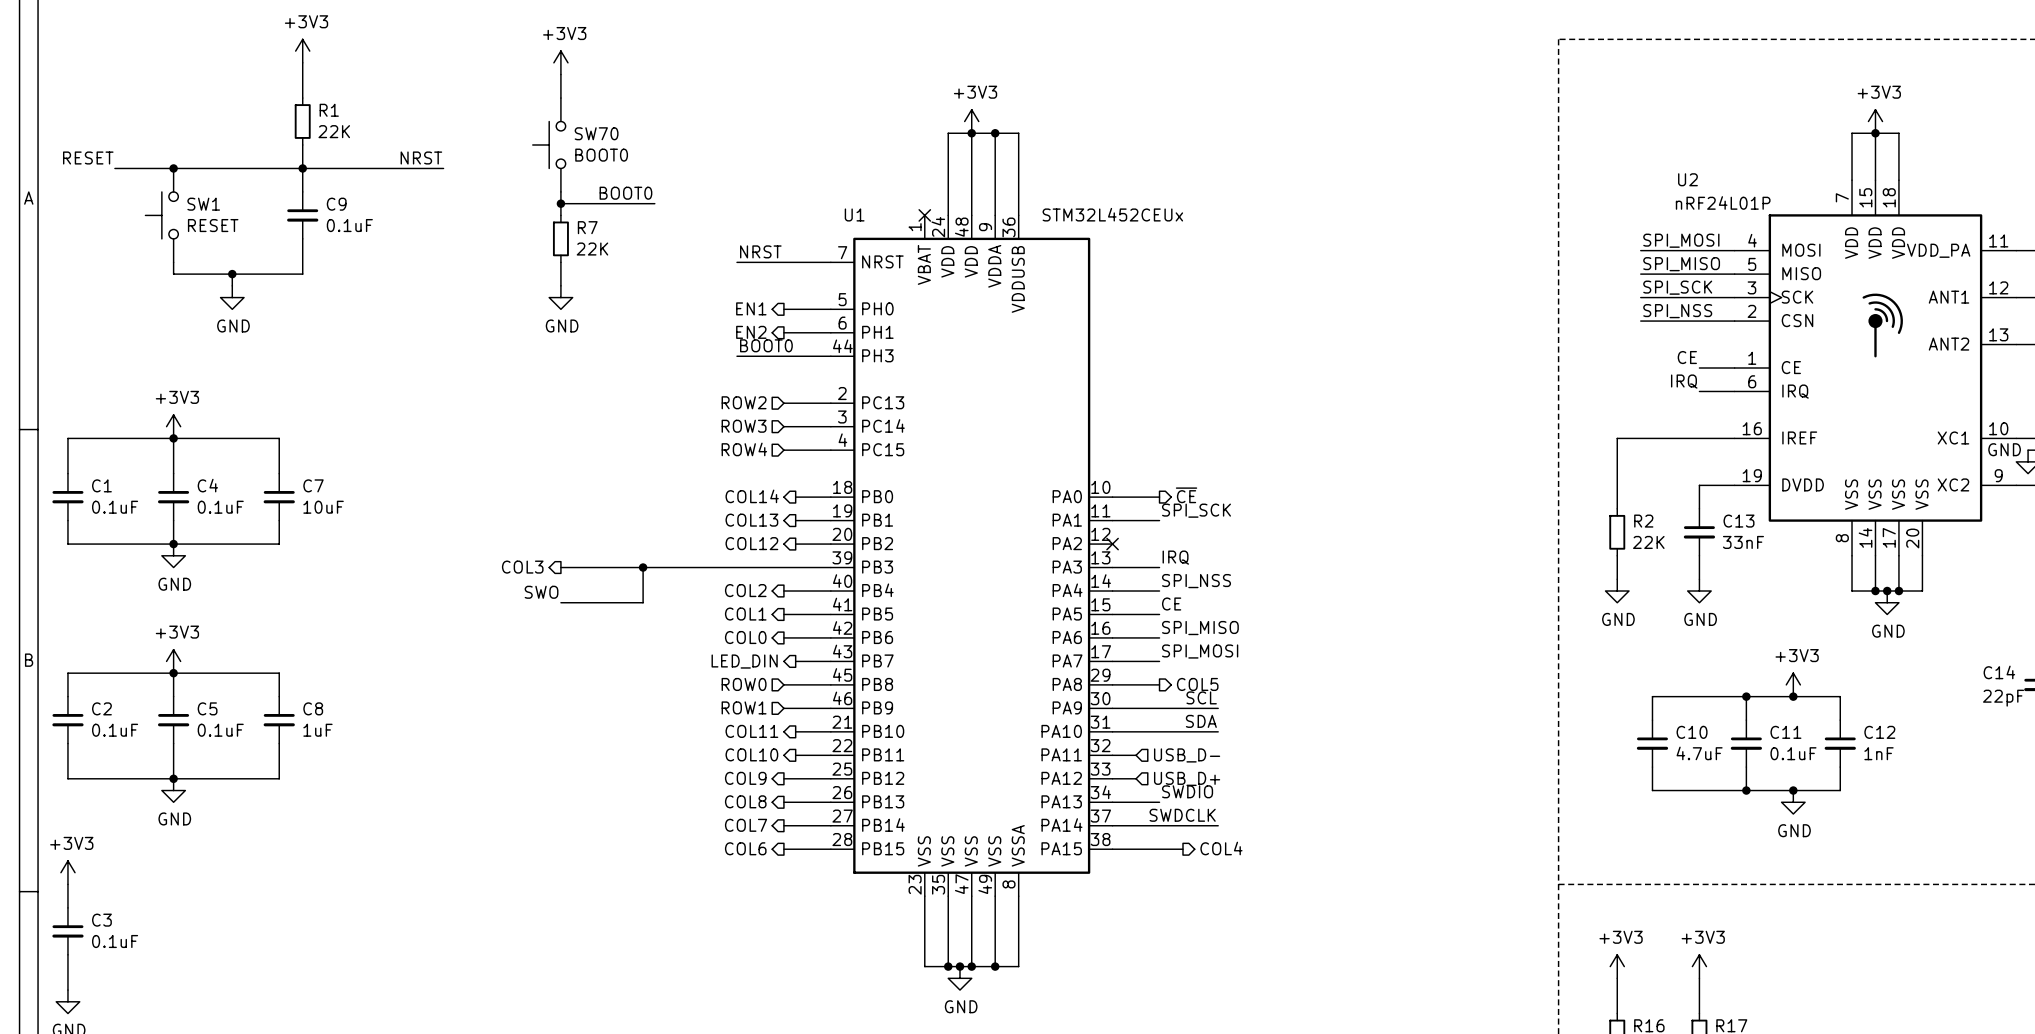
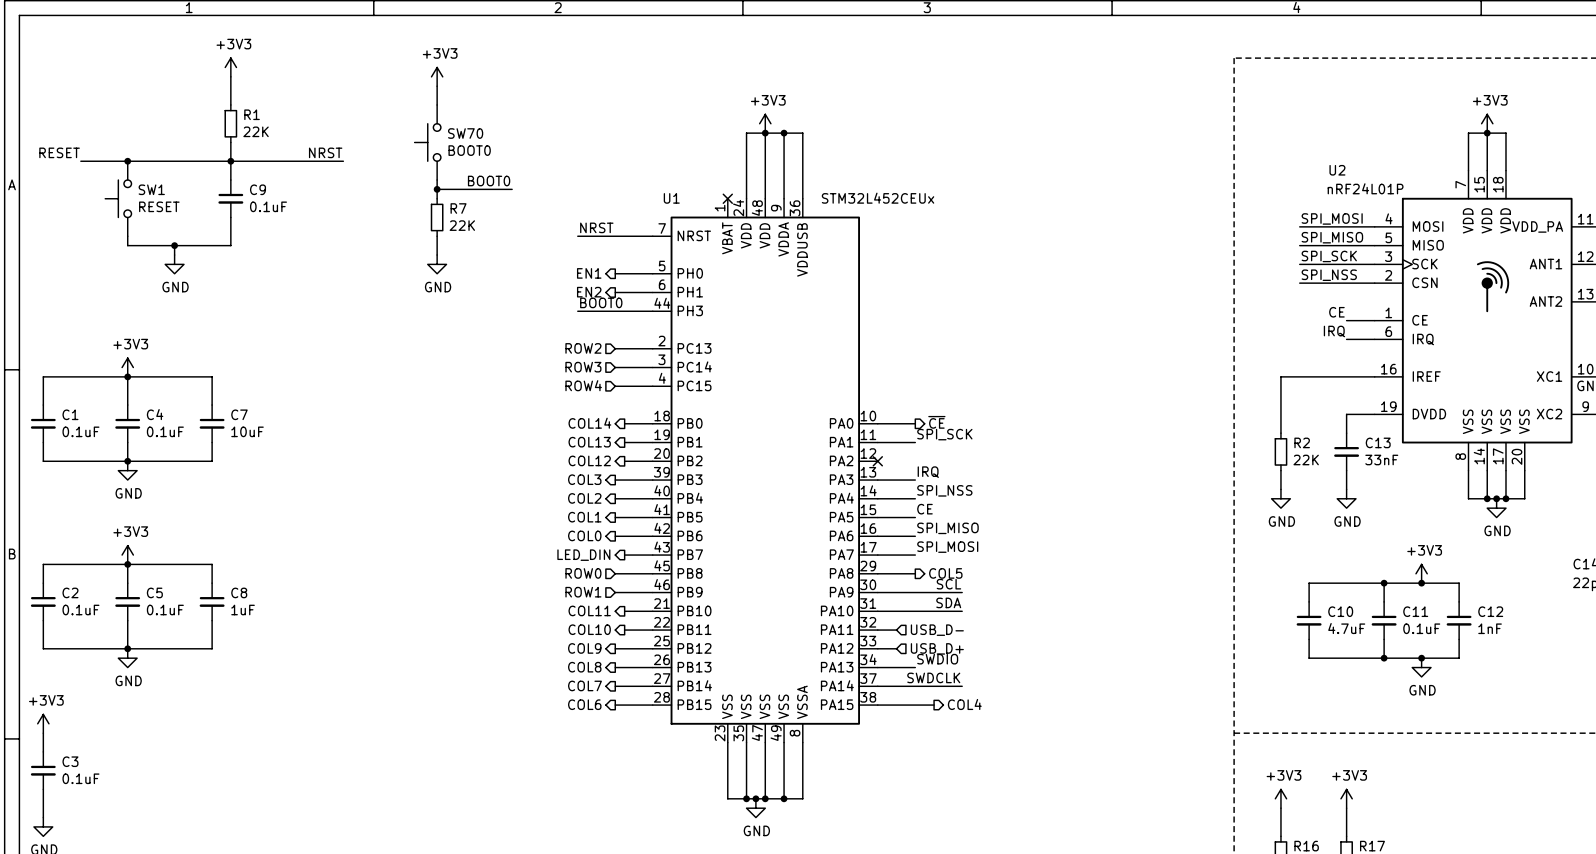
hierarchical label position: COL3 (522, 567) -> COL3 (584, 479)
wire: (560, 567) (783, 567) -> none
wire: (643, 567) (643, 602) (560, 602) -> none
junction: (643, 567) -> none
label: SWO (541, 592) -> none

